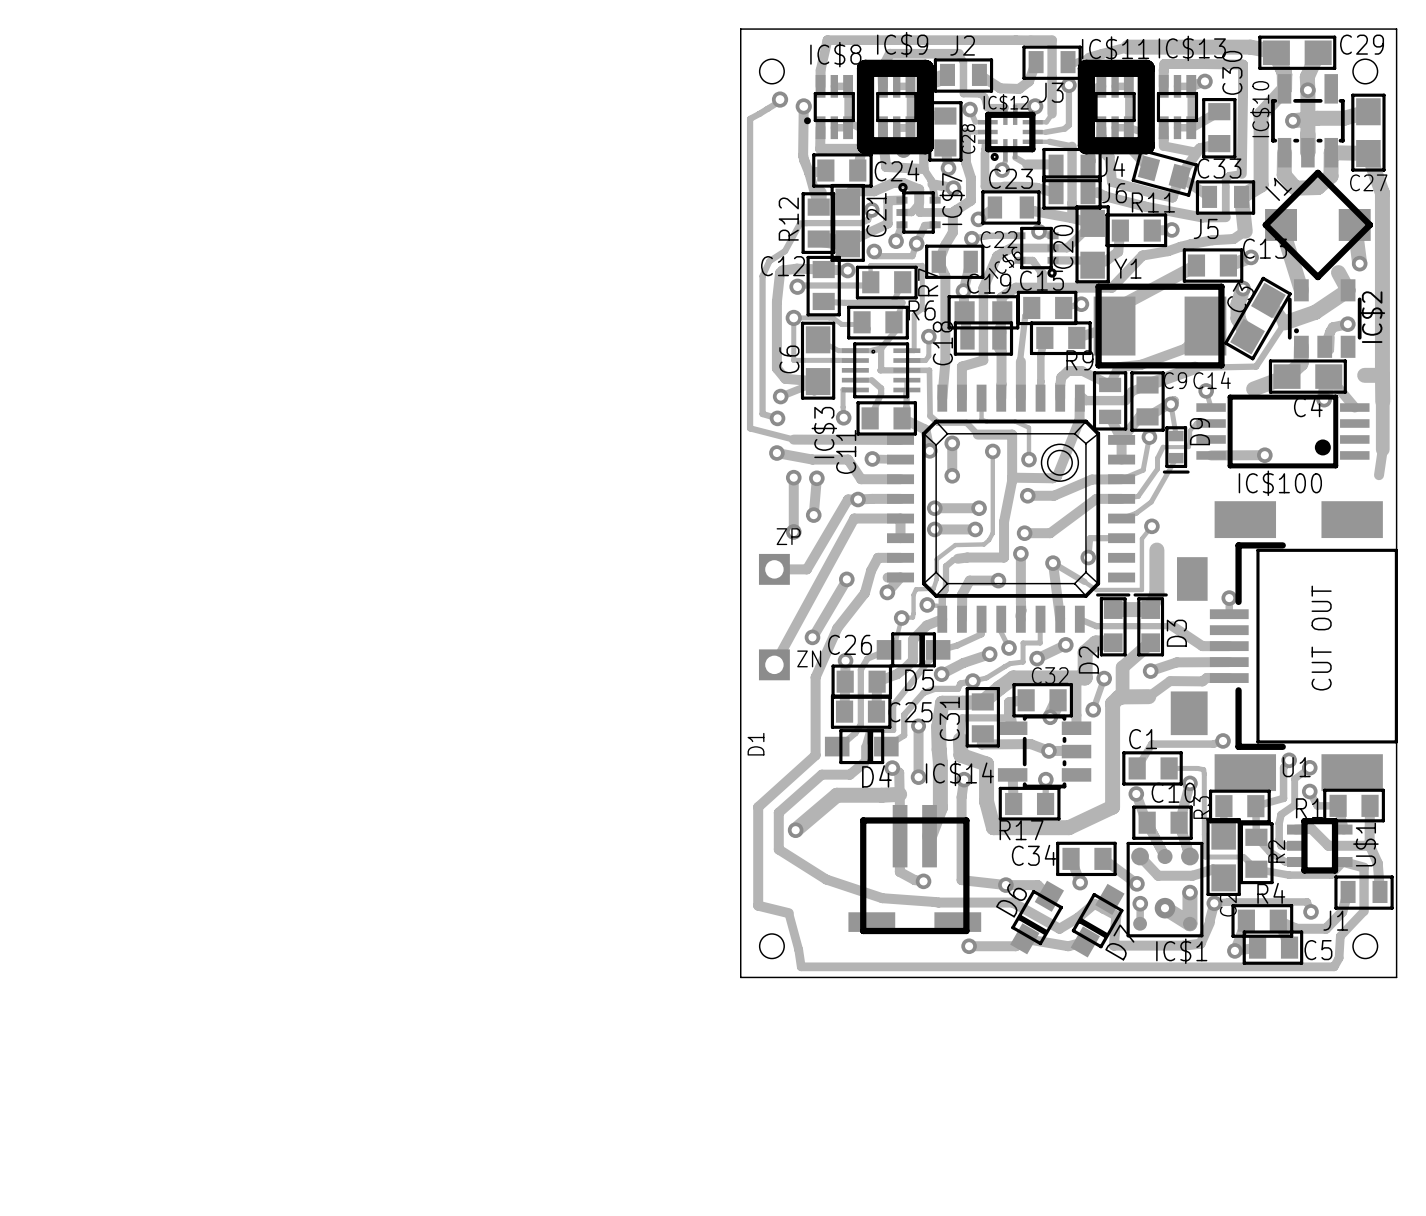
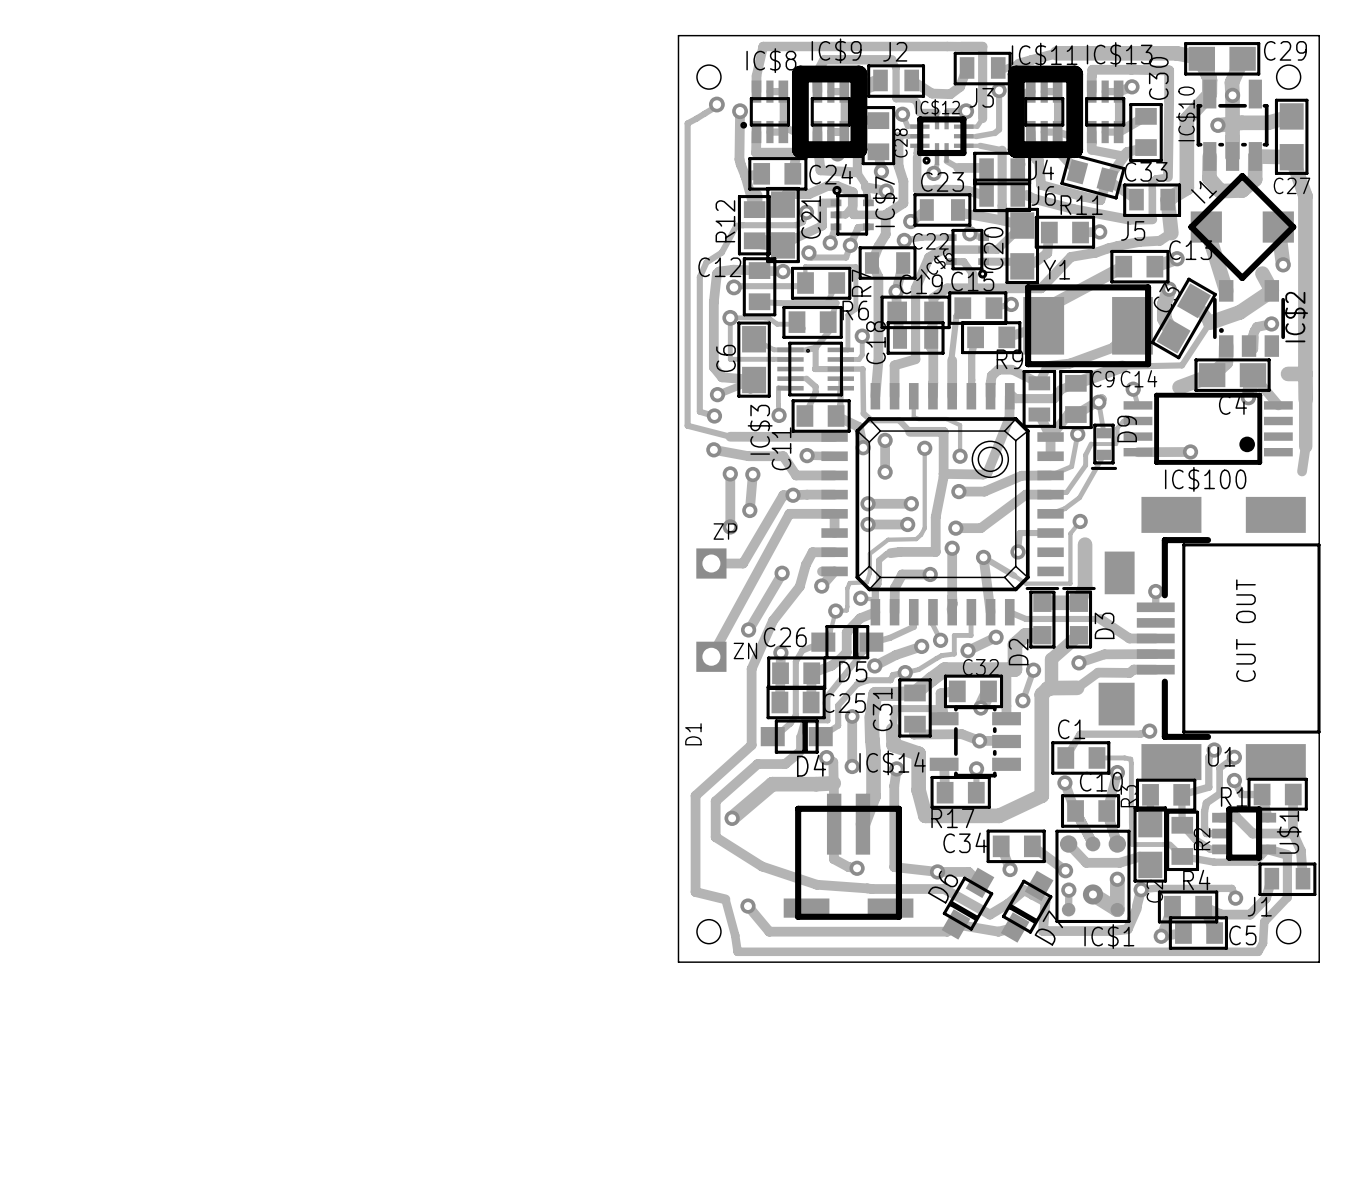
track: none -> (747, 906) (769, 931) (901, 931)
via: none -> (747, 906)
via: (969, 946) -> none

